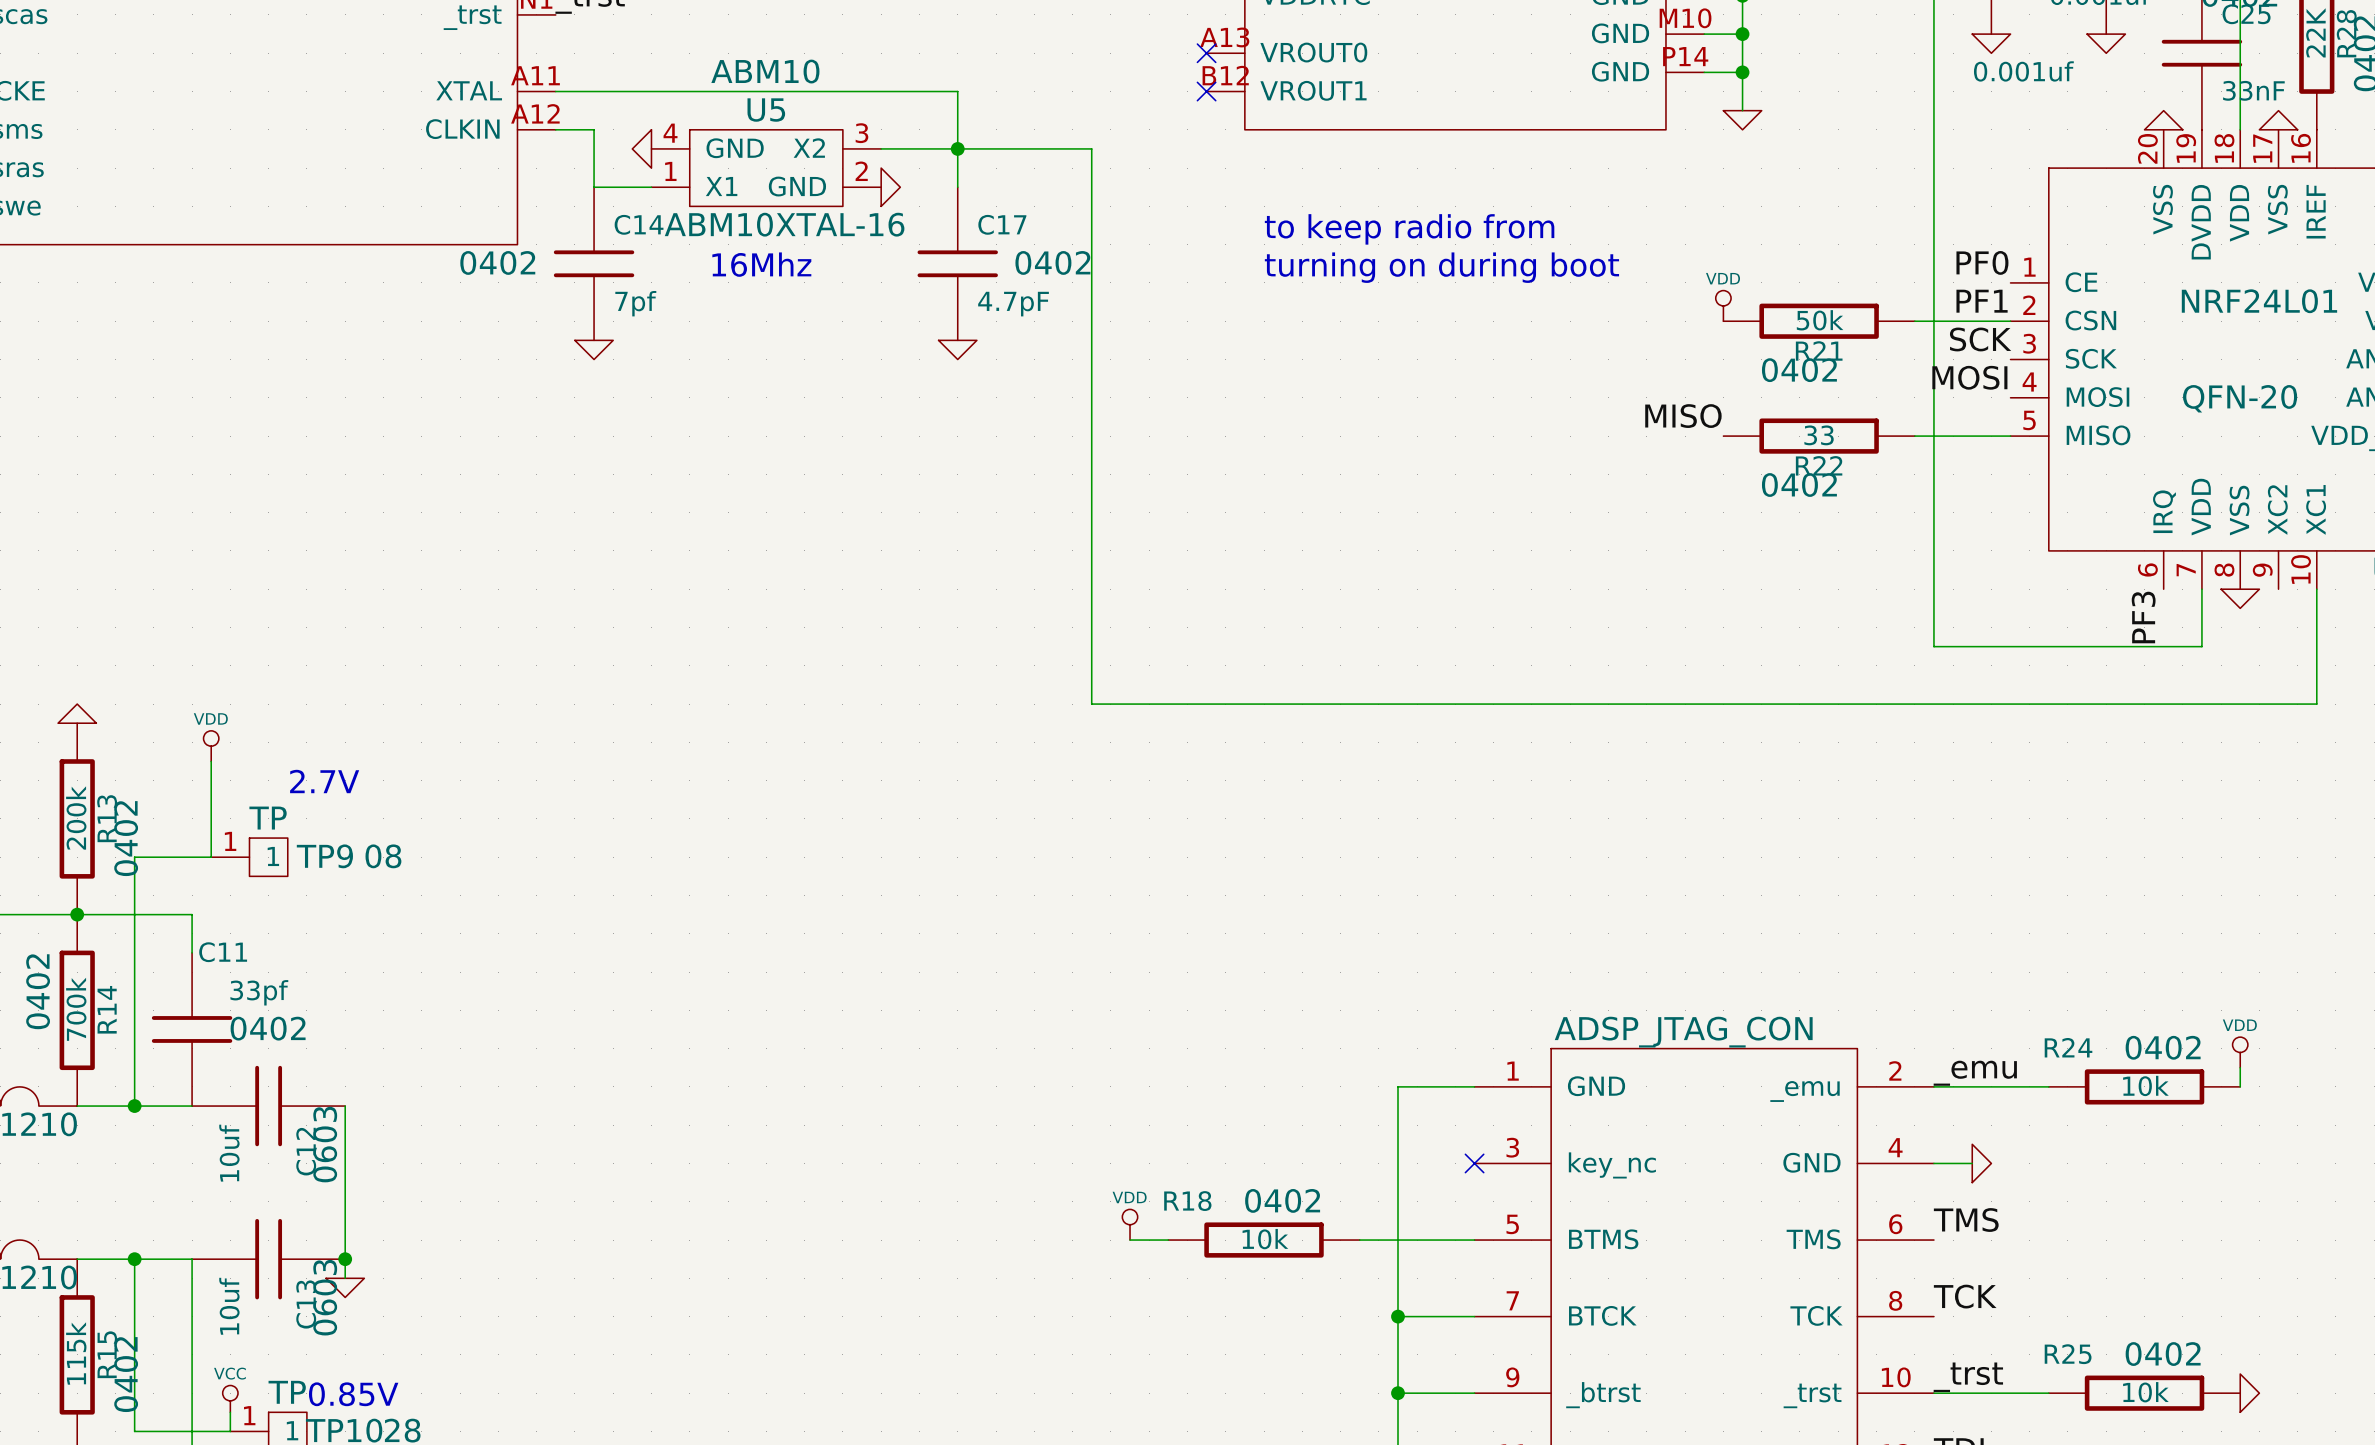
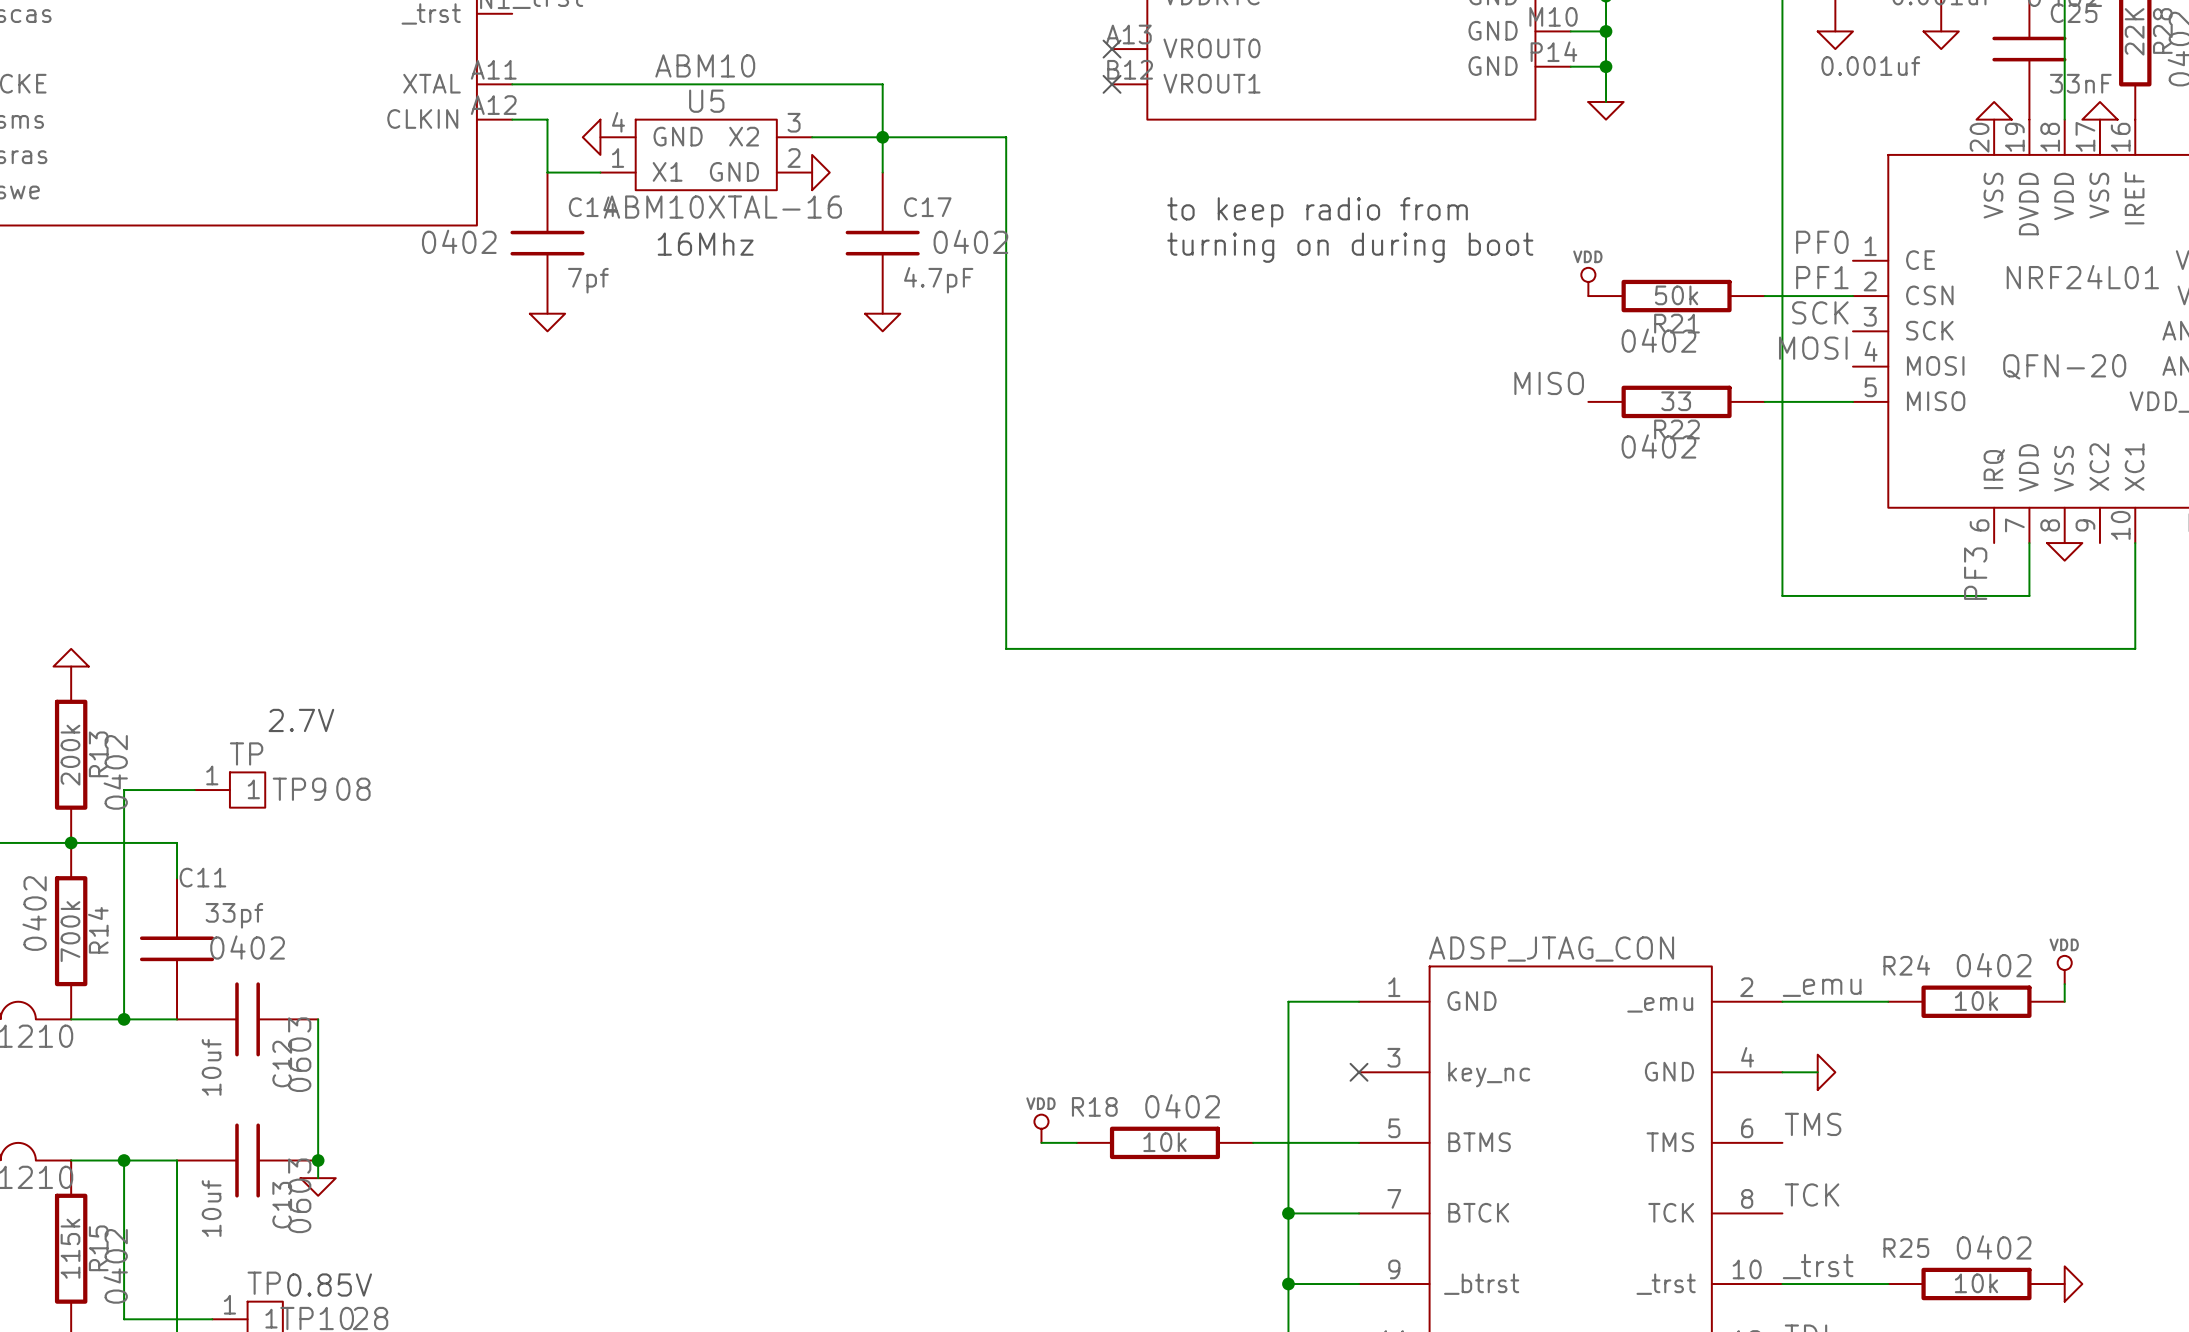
power symbol: VDD (211, 746) -> none
wire: (211, 761) (211, 857) -> none
power symbol: VCC (230, 1398) -> none
wire: (230, 1412) (230, 1431) -> none

